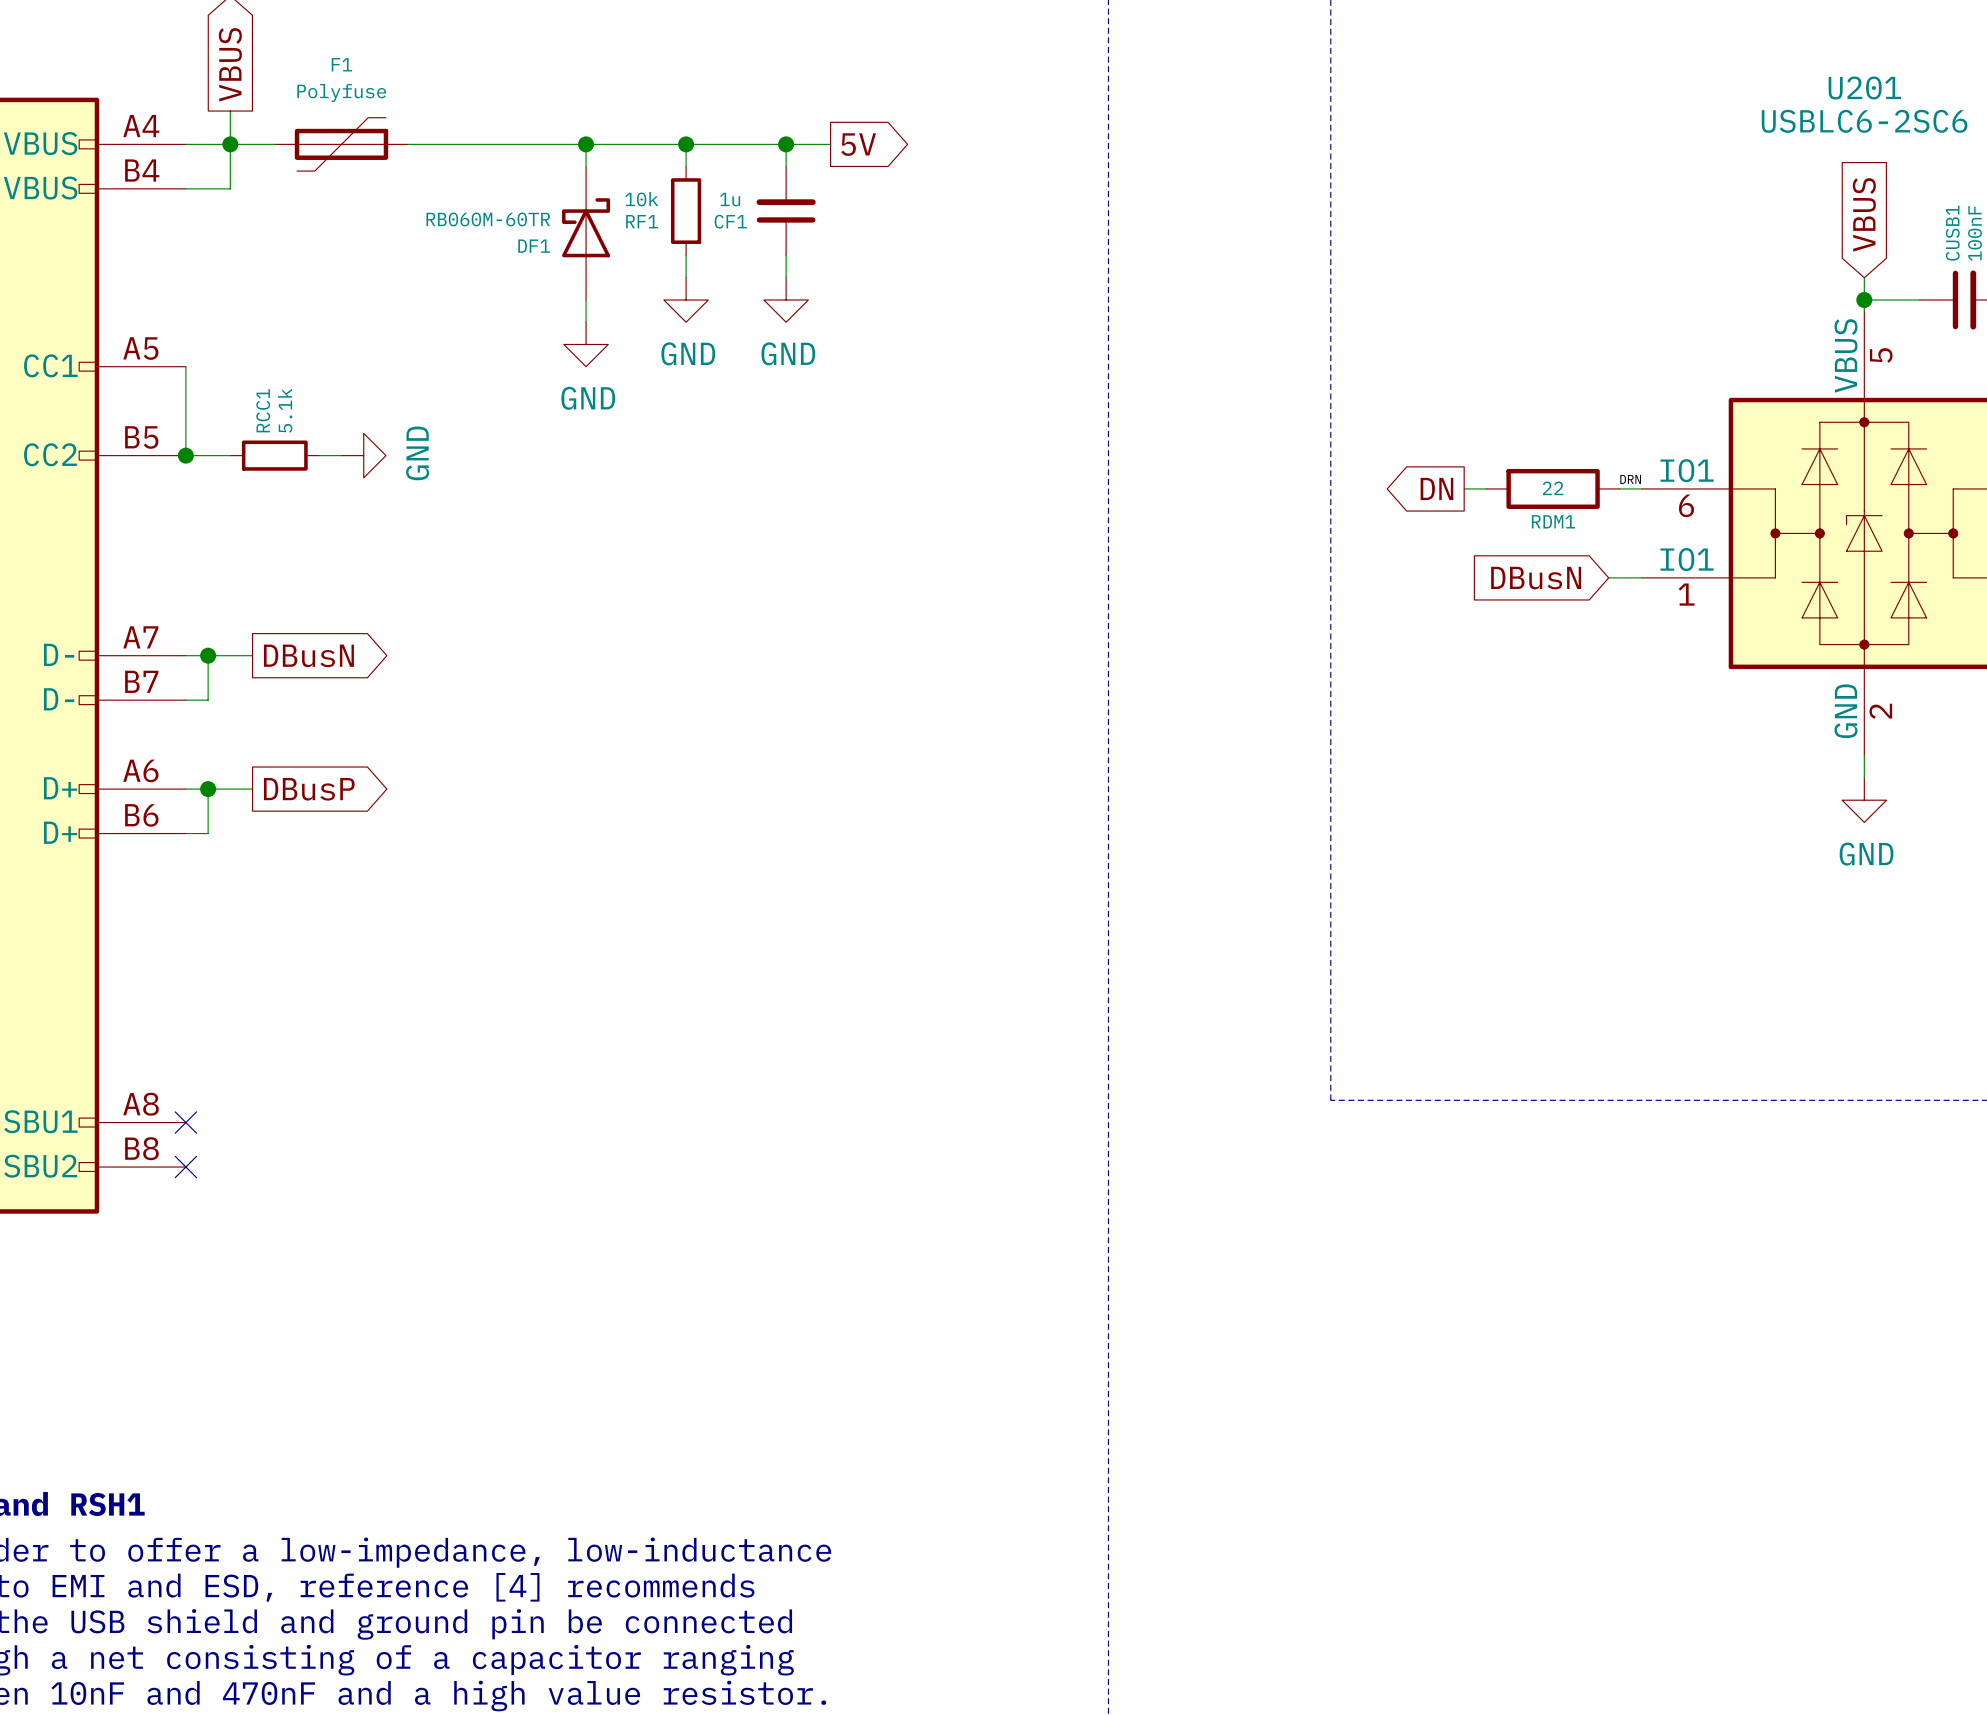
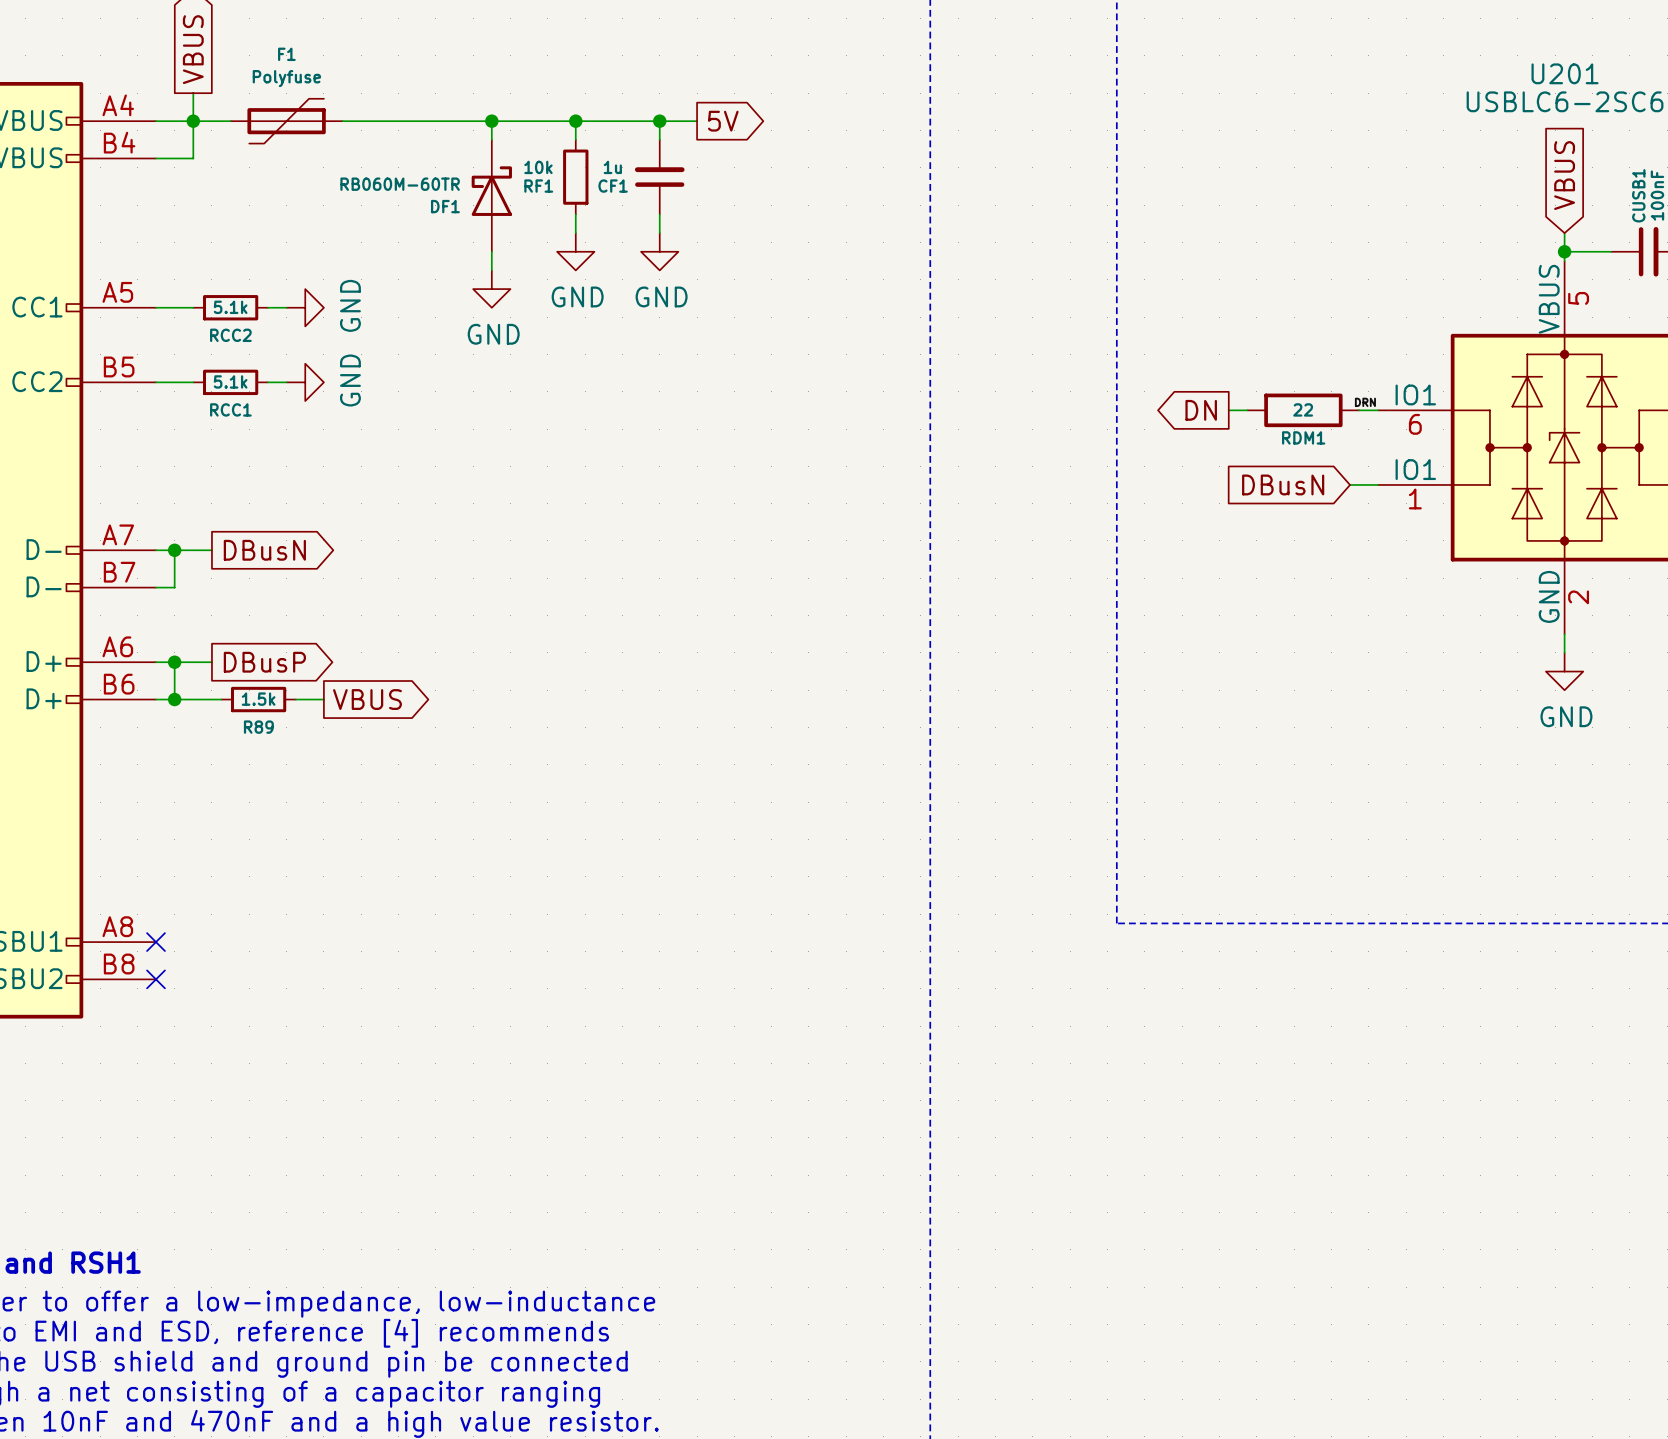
wire: (185, 366) (185, 455) -> (156, 307) (193, 307)
RCC2: none -> 5.1k (230, 307)
wire: none -> (267, 307) (286, 307)
power symbol: none -> GND (305, 307)
RCC1 name rotation: 0° (263, 410) -> 90° clockwise (230, 409)
RCC1 name position: RCC1 (263, 410) -> RCC1 (230, 409)
RCC1 value rotation: 0° (285, 410) -> 90° clockwise (230, 381)
junction: (185, 455) -> none
wire: none -> (174, 699) (221, 699)
junction: none -> (174, 699)
R89: none -> 1.5k (258, 699)
wire: none -> (295, 699) (323, 699)
global label: none -> VBUS (367, 699)

